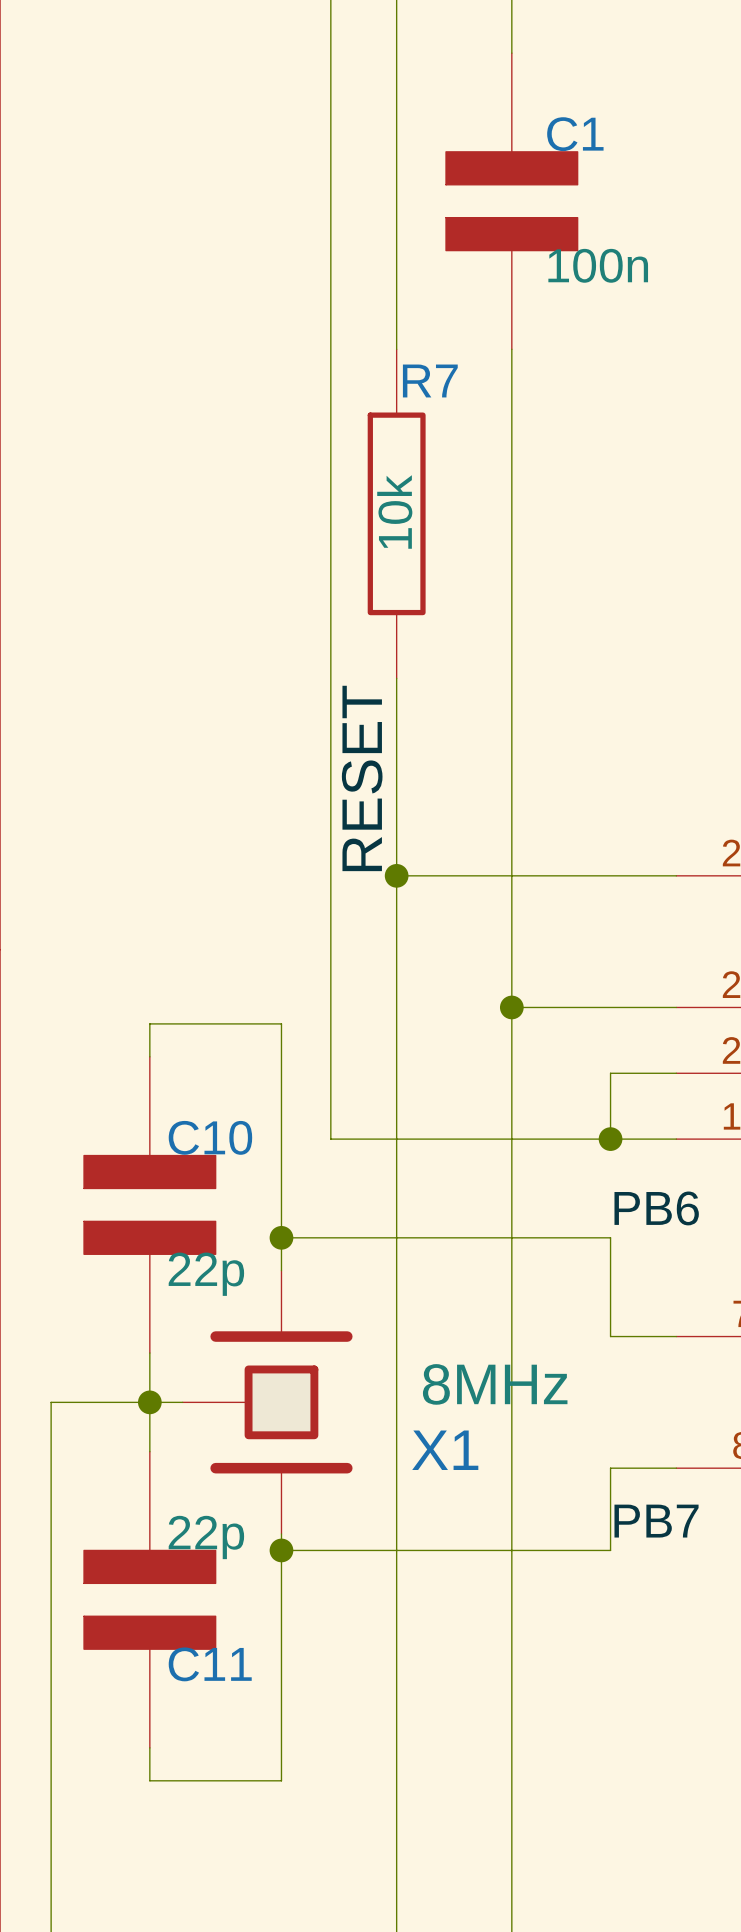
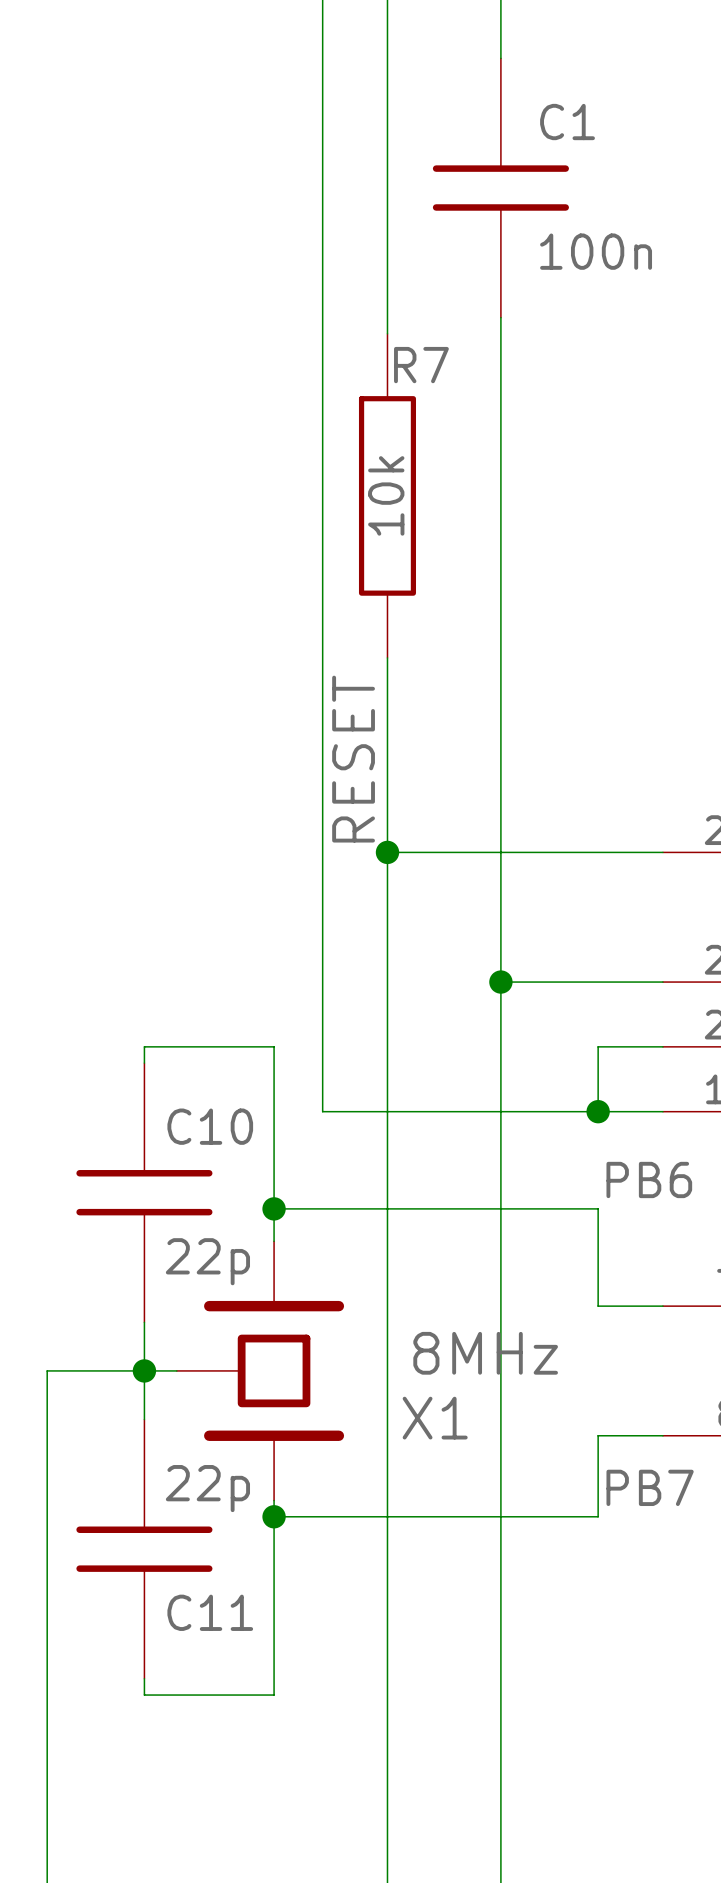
C1 symbol: [446, 53, 578, 350] -> [432, 58, 569, 318]
C10 symbol: [84, 1056, 216, 1354] -> [76, 1063, 213, 1323]
wire: (149, 1056) (149, 1023) (281, 1023) (281, 1073) -> (144, 1063) (144, 1046) (274, 1046)
C11 symbol: [84, 1451, 216, 1748] -> [76, 1419, 213, 1679]
wire: (281, 1731) (281, 1780) (149, 1780) (149, 1747) -> (274, 1695) (144, 1695) (144, 1678)

